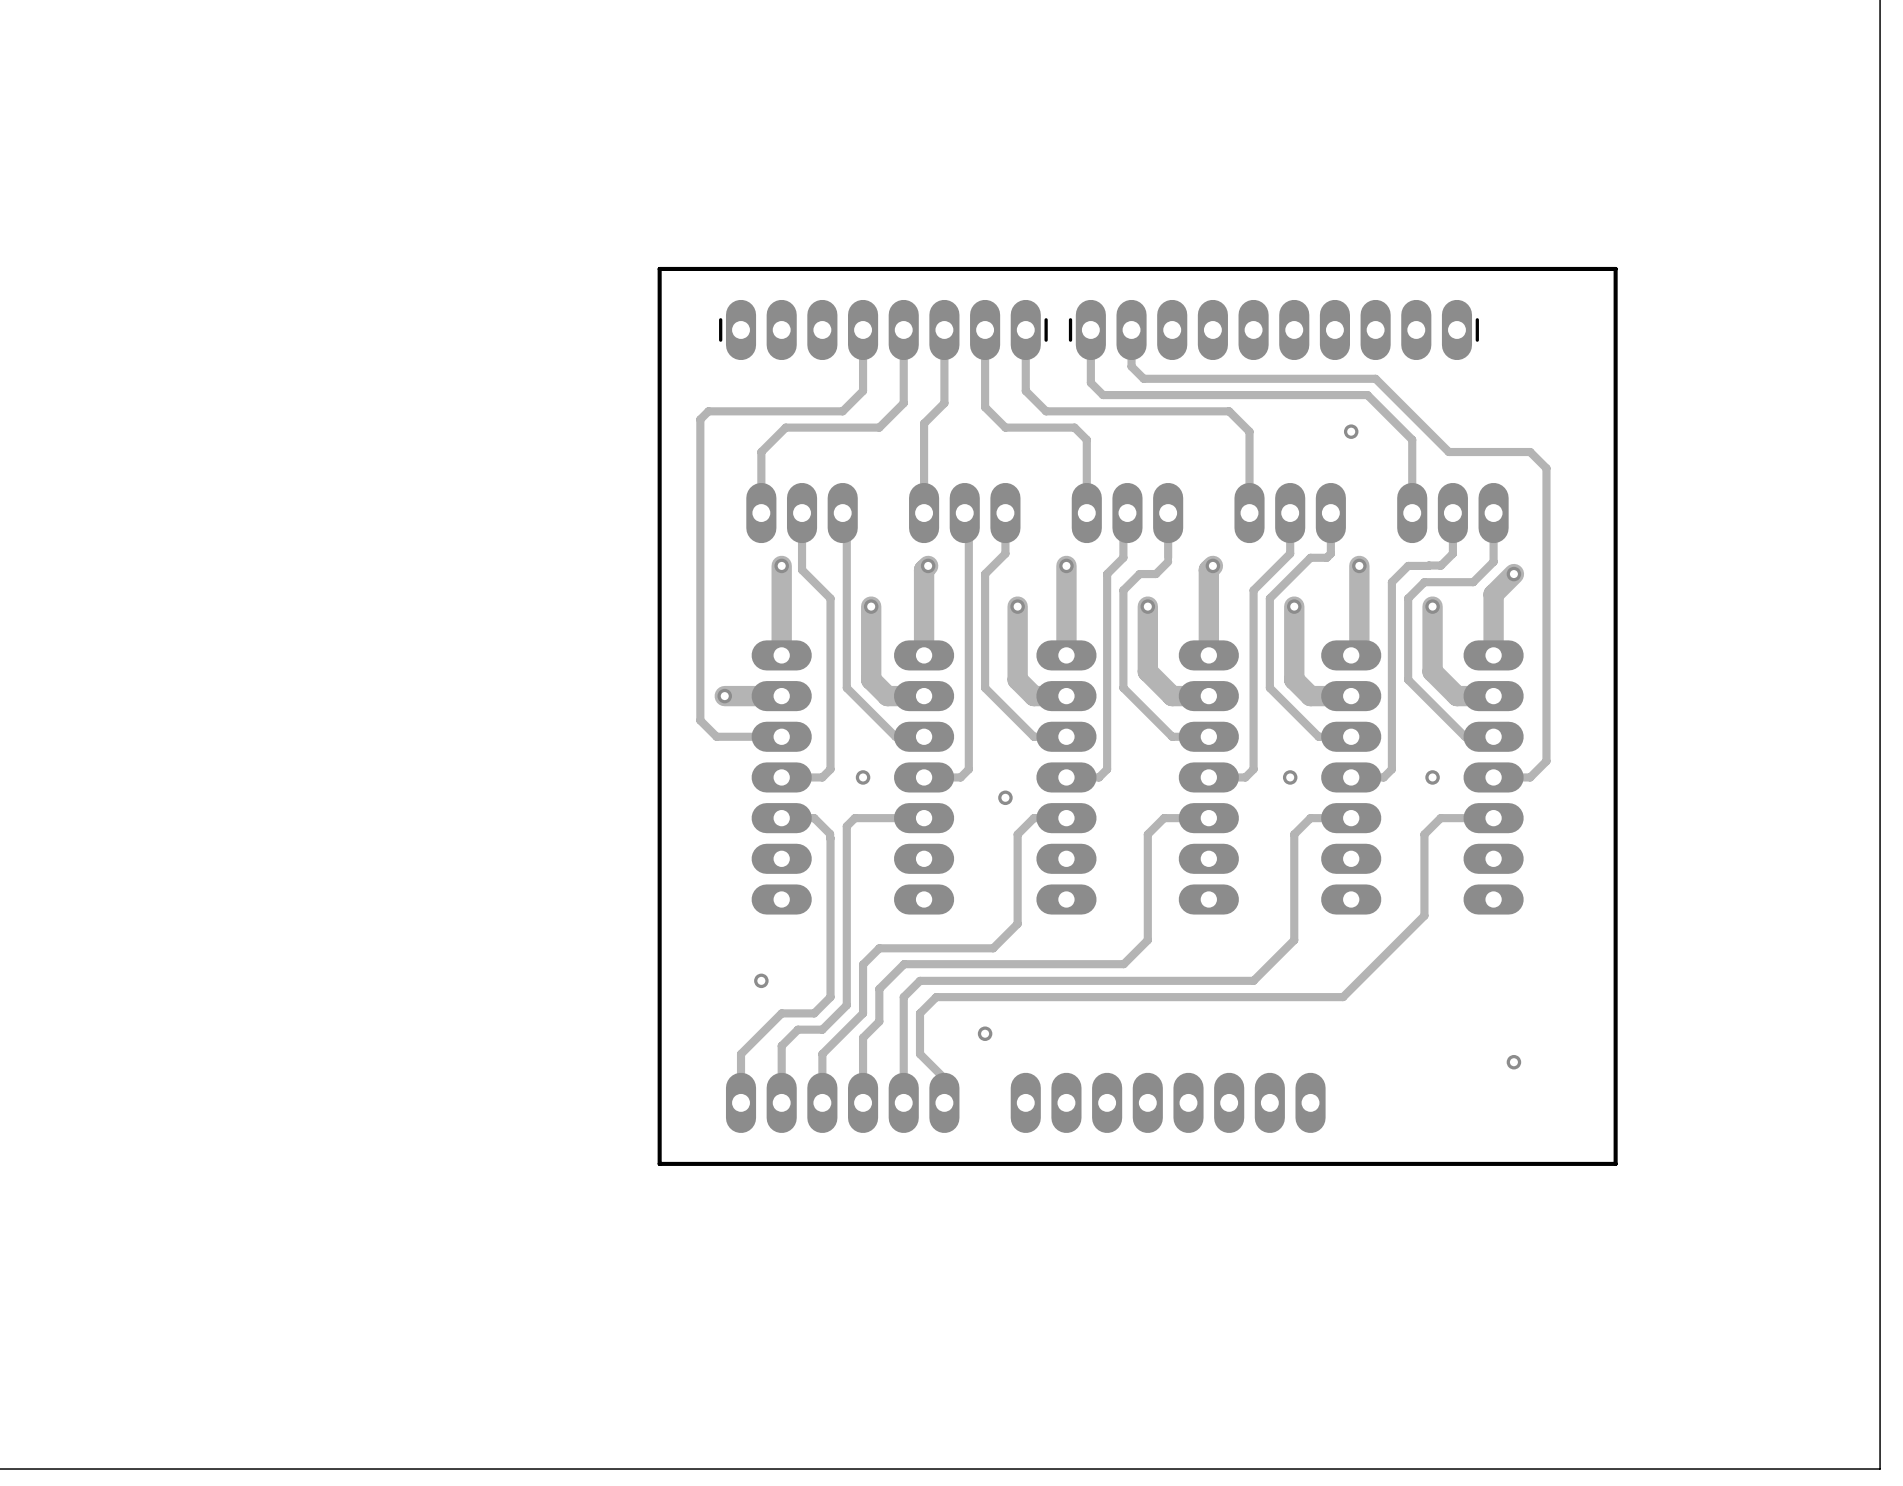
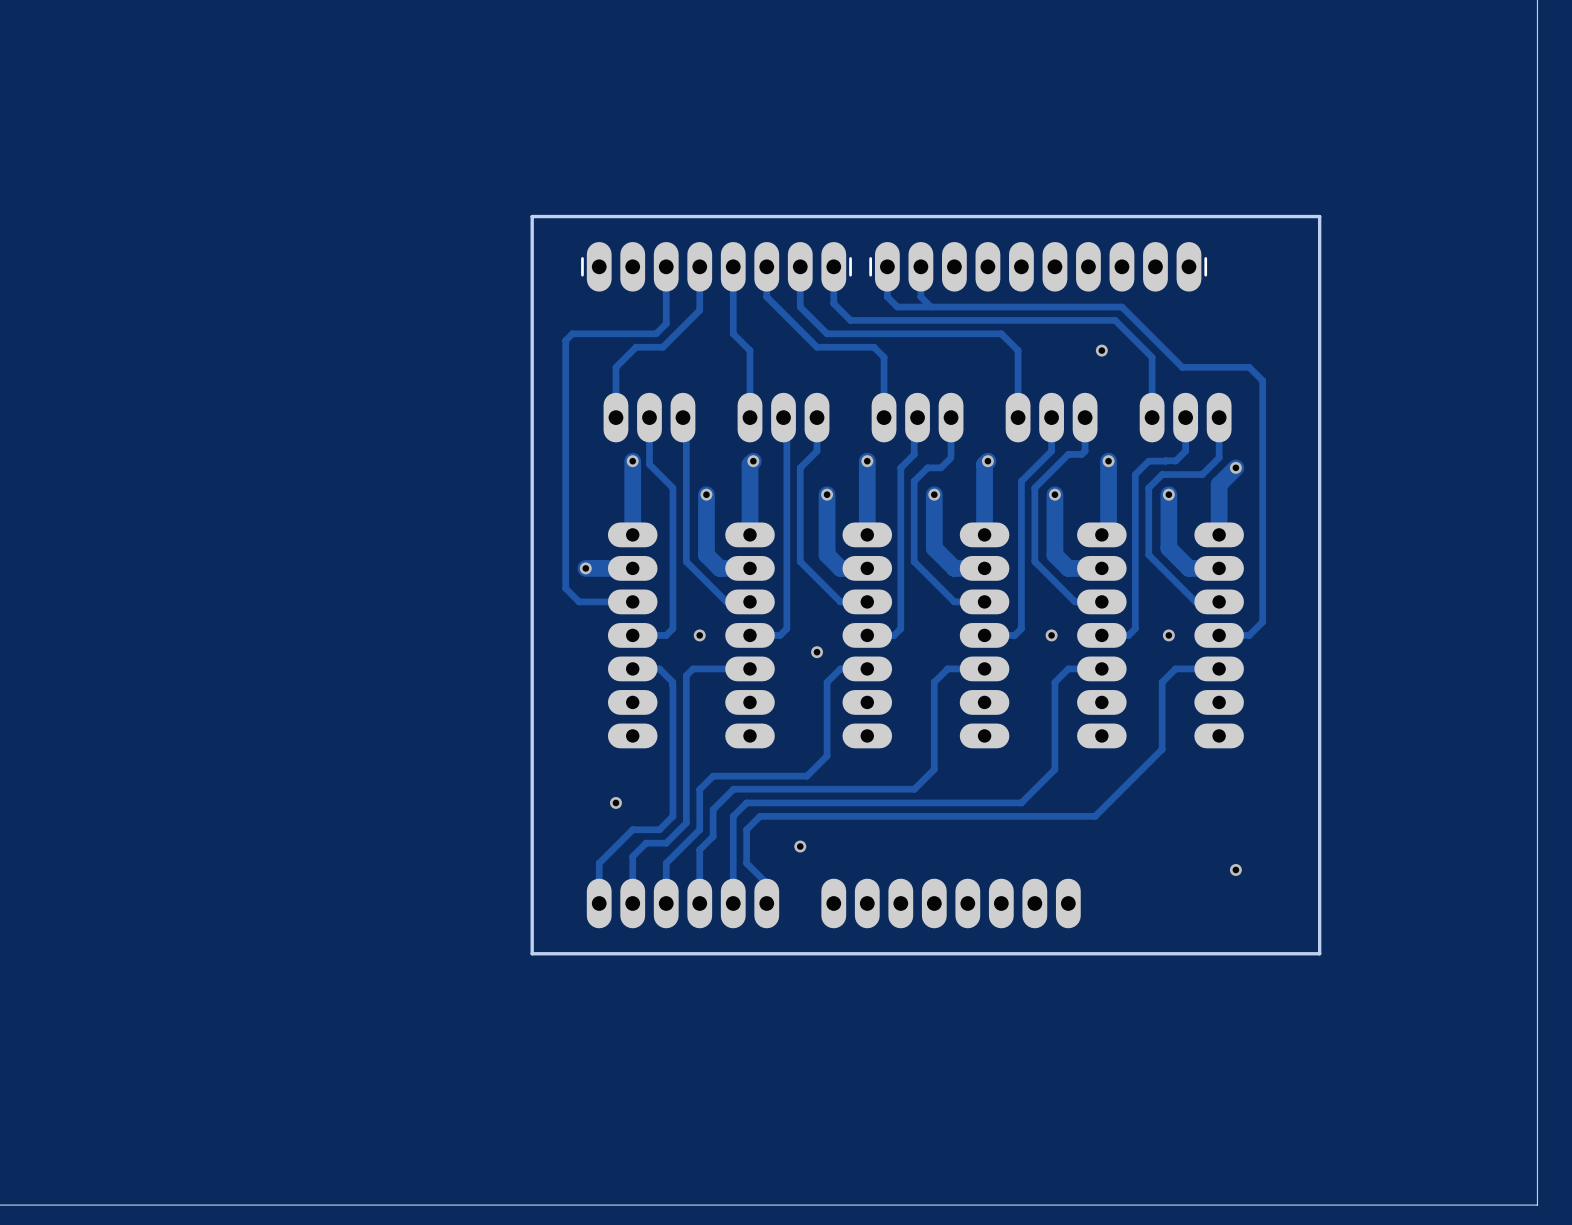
track: none -> (666, 266) (666, 323) (656, 333)
track: (944, 366) (944, 403) (924, 423) (924, 431) -> (733, 327) (733, 333) (750, 350)
track: (1090, 366) (1090, 382) (1103, 395) -> (887, 296) (897, 307) (930, 307)
track: (1025, 374) (1025, 391) (1046, 411) -> (800, 307) (827, 333) (850, 333)
track: none -> (833, 303) (850, 320) (897, 320)
track: (985, 378) (985, 407) -> (766, 296) (800, 330)
track: (863, 382) (863, 391) (842, 411) (810, 411) -> (699, 310) (662, 347)
track: (903, 403) (879, 427) (818, 427) -> none

